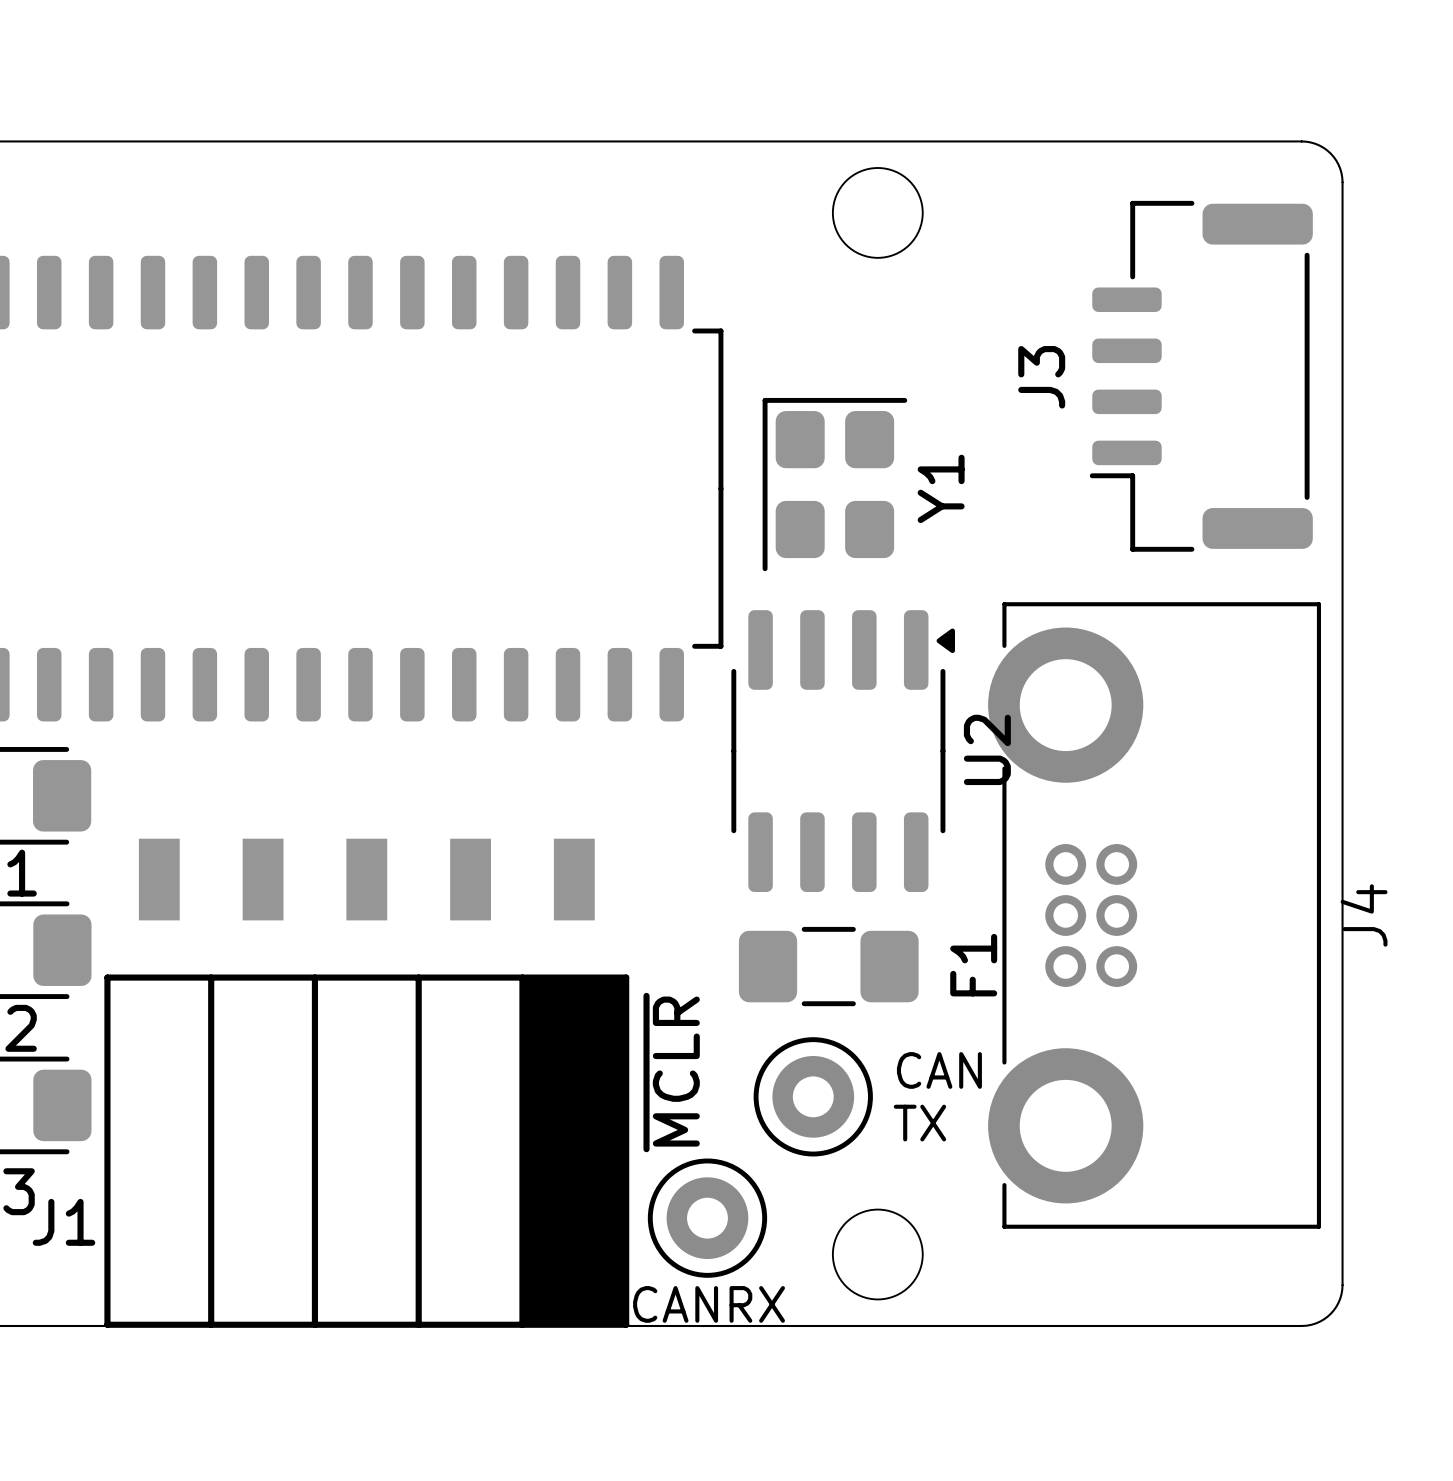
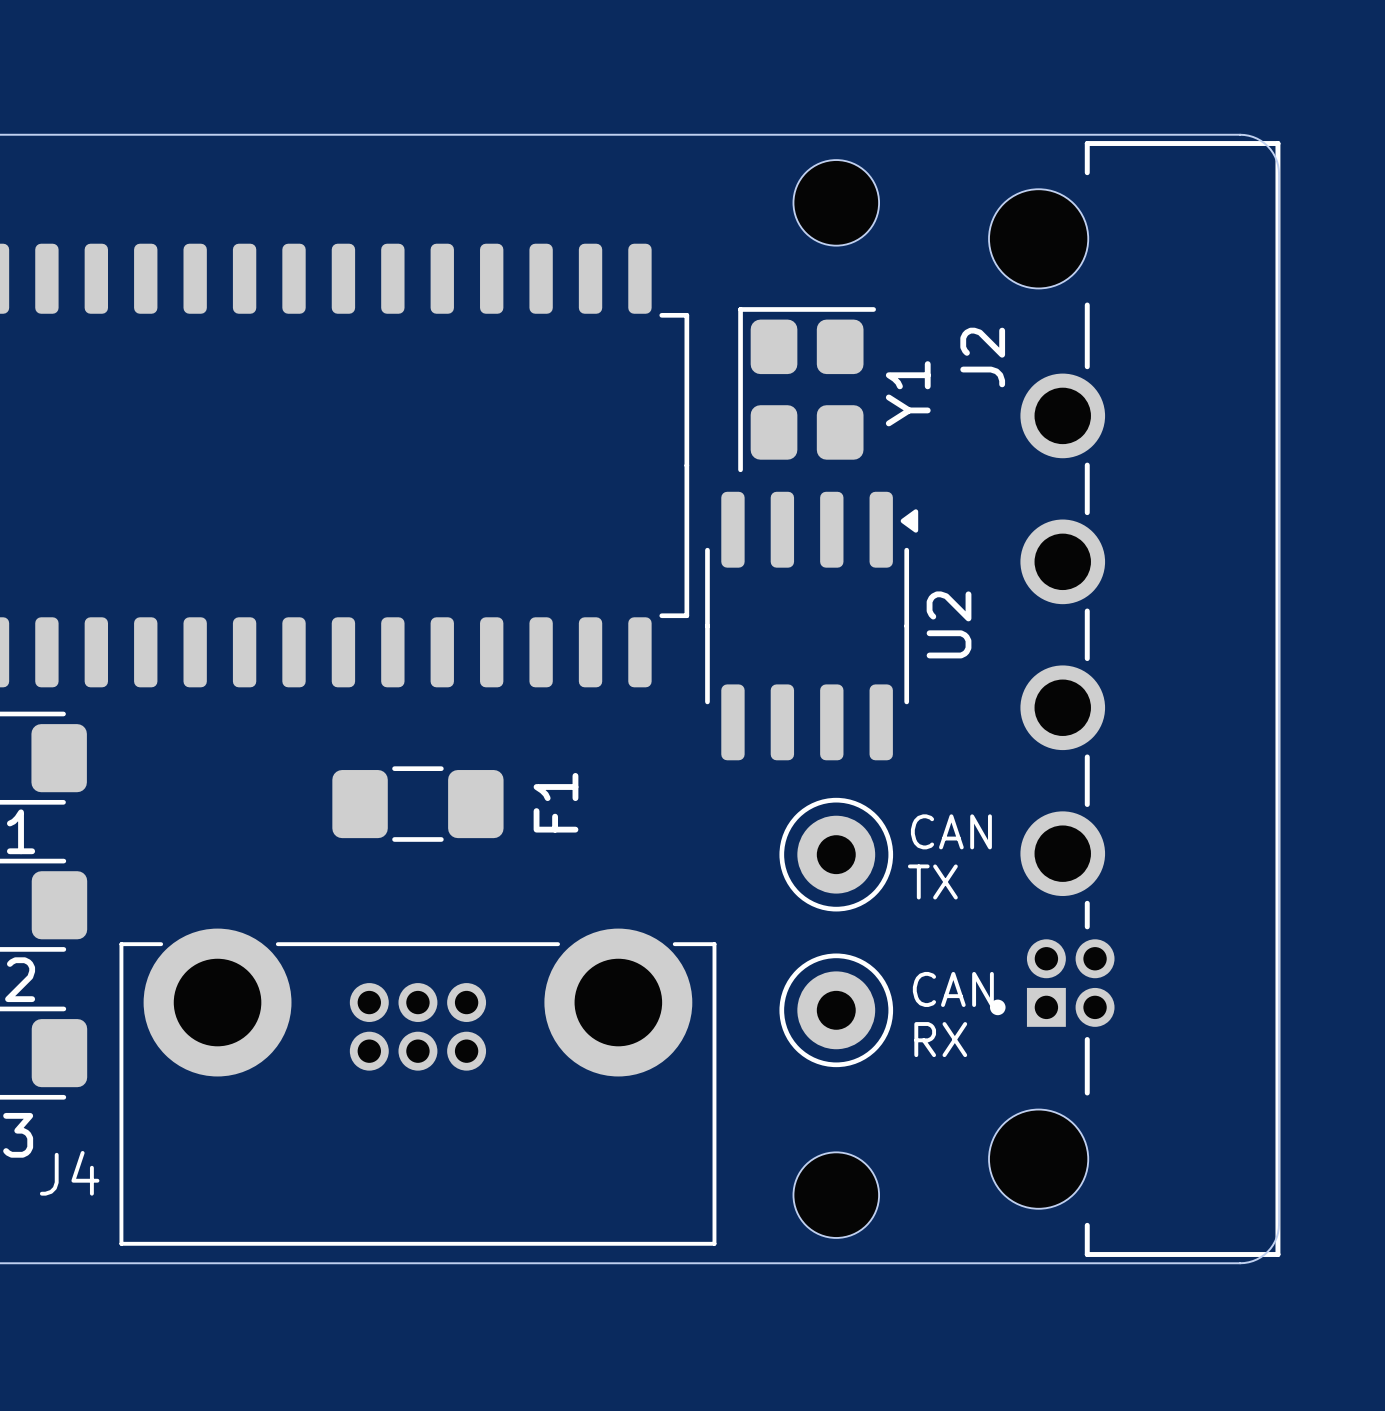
J3: (1201, 376) -> none
Y1 position: (834, 484) -> (807, 389)
J2: none -> (1134, 699)
U2 position: (843, 751) -> (811, 626)
text: none -> CAN (951, 831)
part: none -> (836, 854)
J4 rotation: 0° (1154, 915) -> 90° clockwise (417, 1087)
J4 position: (1154, 915) -> (417, 1087)
J4 name position: J4 (1364, 915) -> J4 (69, 1173)
F1 position: (828, 966) -> (417, 804)
text position: CAN (939, 1070) -> CAN (953, 989)
text: ~{MCLR} (671, 1072) -> none
J1: (366, 1083) -> none
text: none -> RX (940, 1039)
part position: (813, 1096) -> (836, 1010)
text position: TX (919, 1123) -> TX (932, 881)
part: (707, 1218) -> none
text: CANRX (709, 1304) -> none

